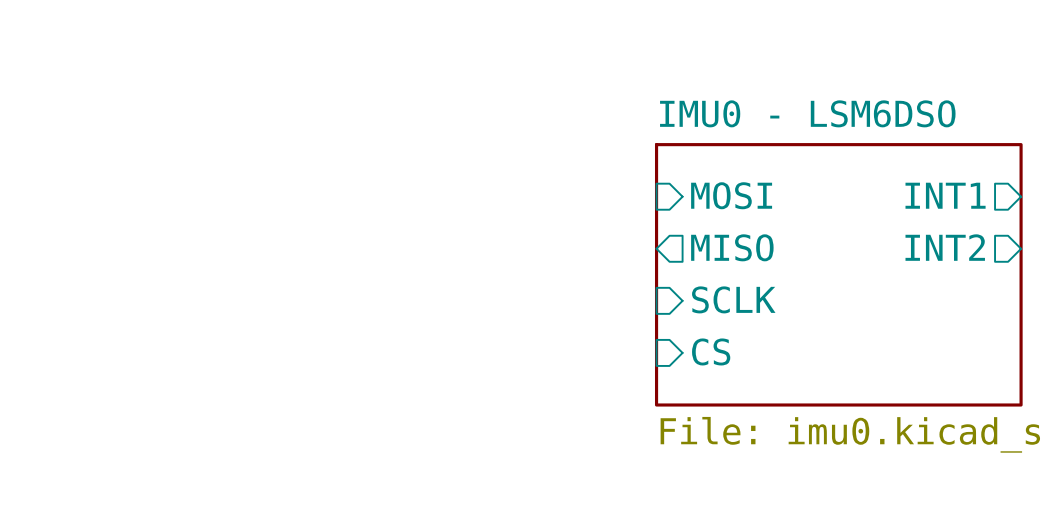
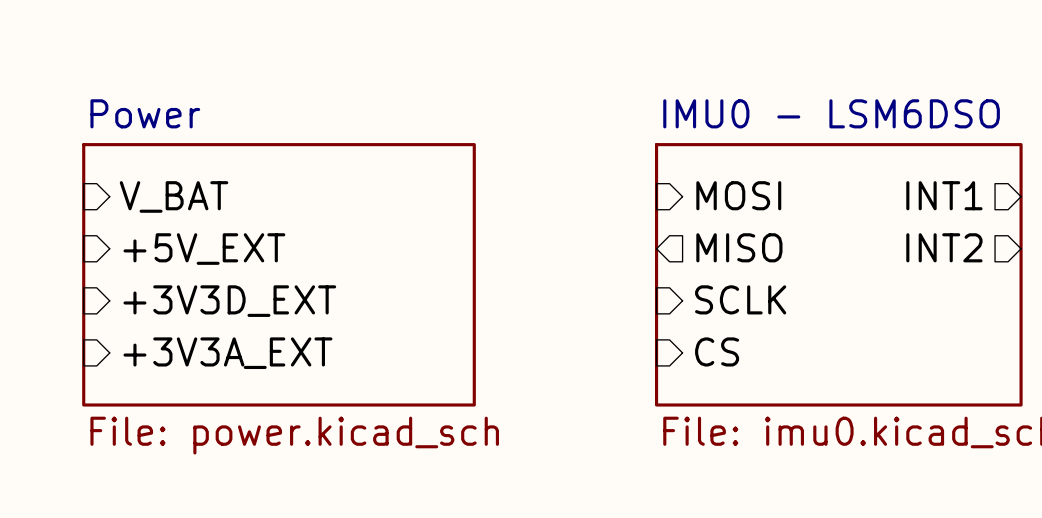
sheet pin: none -> V_BAT (174, 196)
sheet pin: none -> +5V_EXT (204, 249)
sheet Power: none -> File: power.kicad_sch (279, 274)
sheet pin: none -> +3V3D_EXT (229, 301)
sheet pin: none -> +3V3A_EXT (227, 353)

